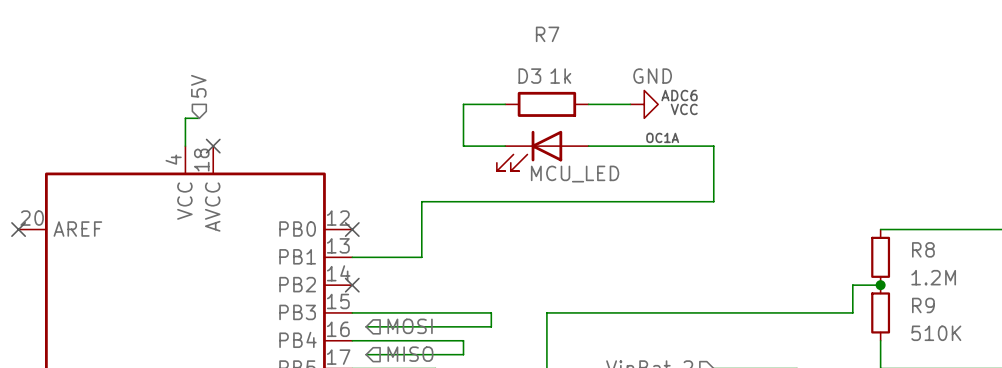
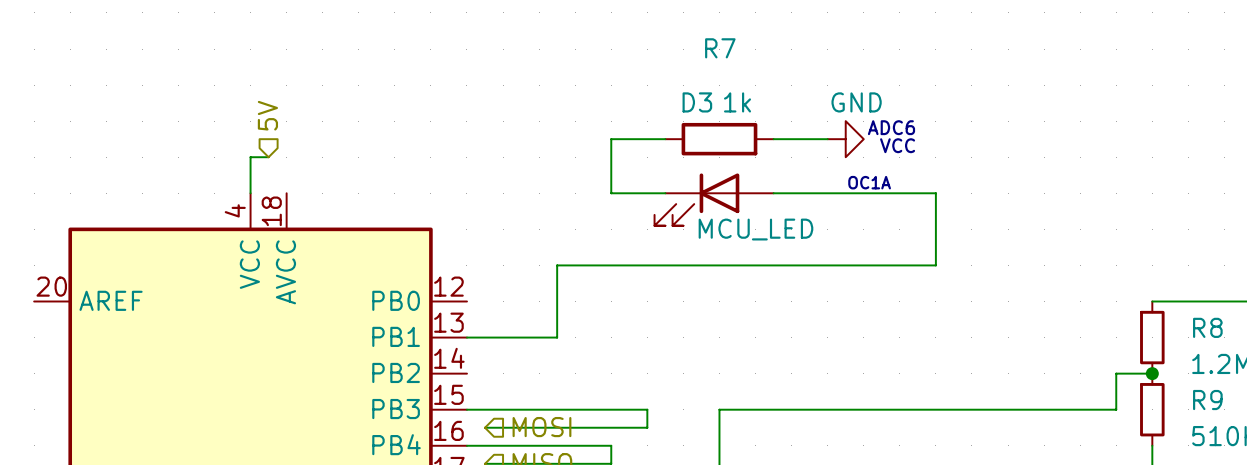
no-connect mark: (213, 146) -> none
no-connect mark: (18, 229) -> none
no-connect mark: (352, 229) -> none
no-connect mark: (352, 285) -> none

